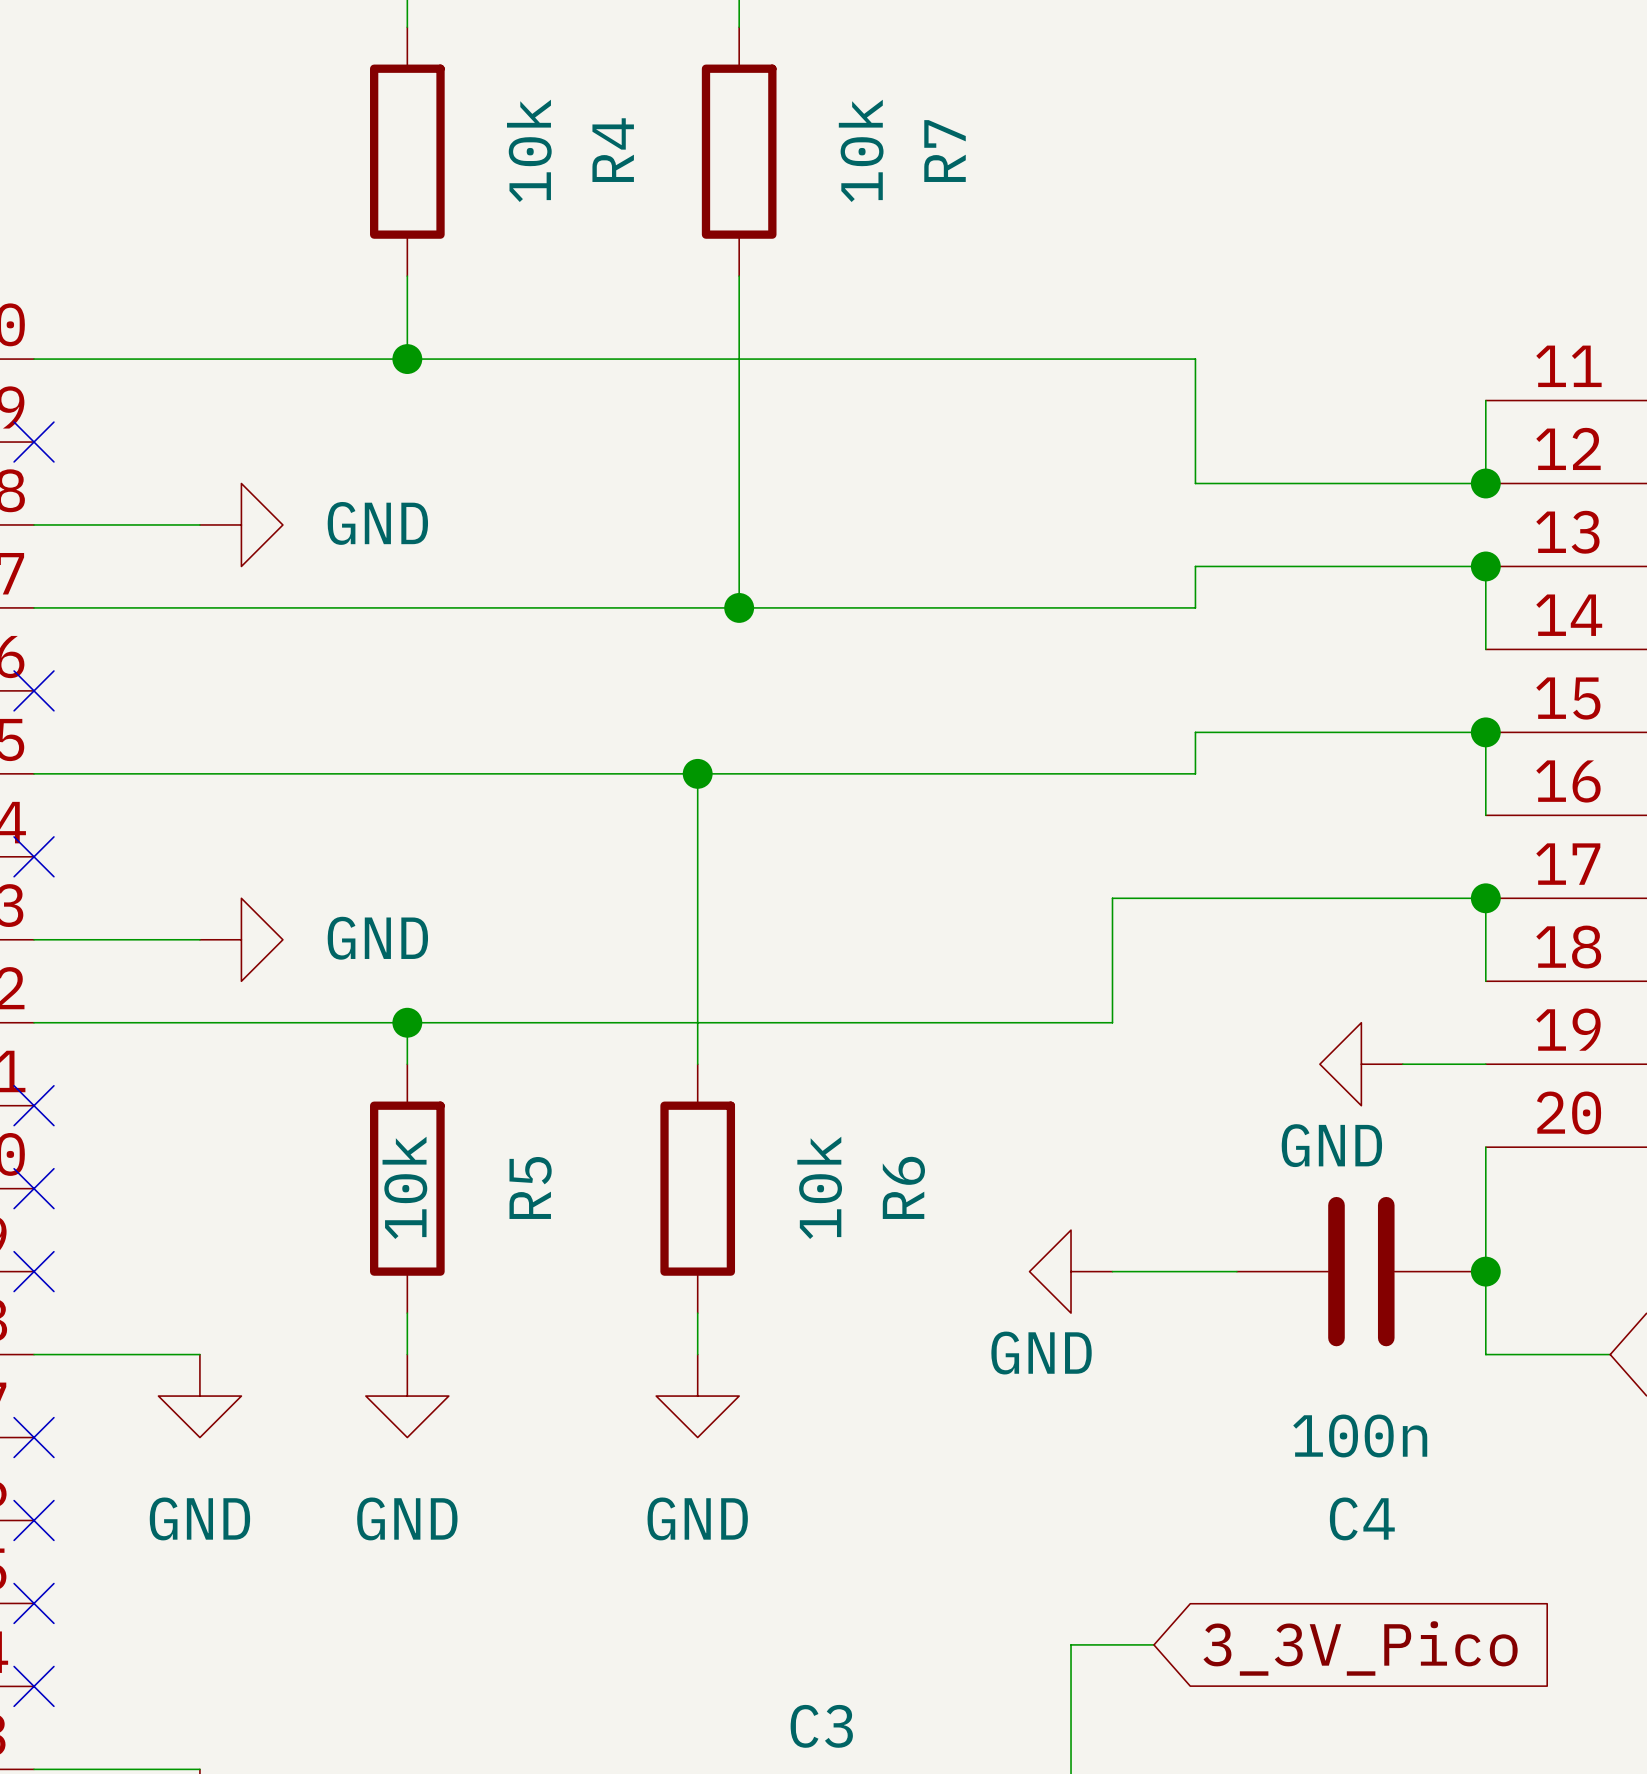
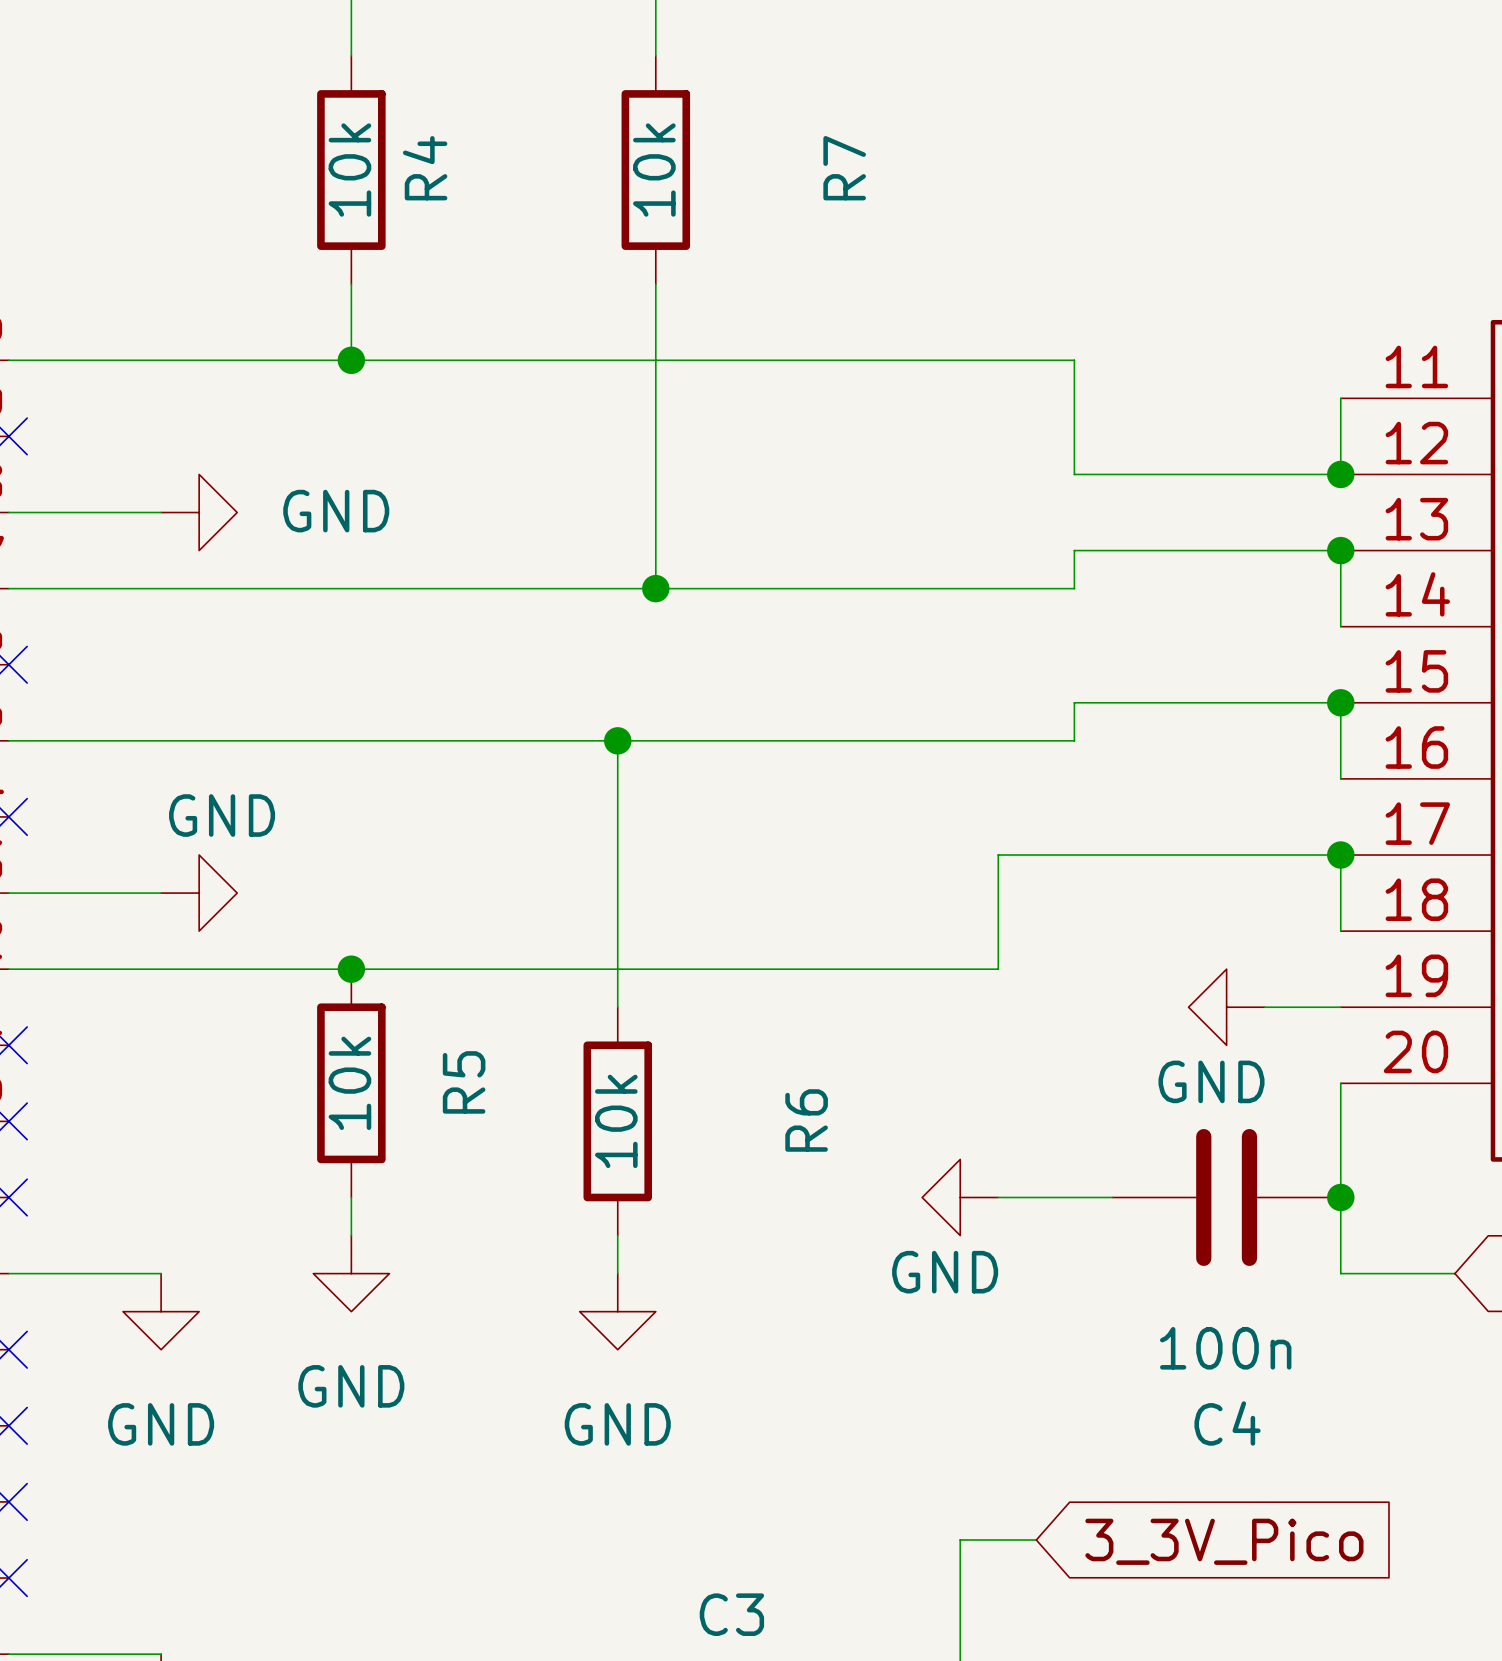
R4 value position: 10k (529, 150) -> 10k (349, 170)
R4 name position: R4 (613, 150) -> R4 (425, 168)
R7 value position: 10k (861, 150) -> 10k (654, 170)
power symbol text position: GND (377, 938) -> GND (222, 815)
R6 value position: 10k (819, 1187) -> 10k (616, 1121)
R5 position: (407, 1188) -> (351, 1083)
power symbol position: GND (407, 1396) -> GND (351, 1273)

